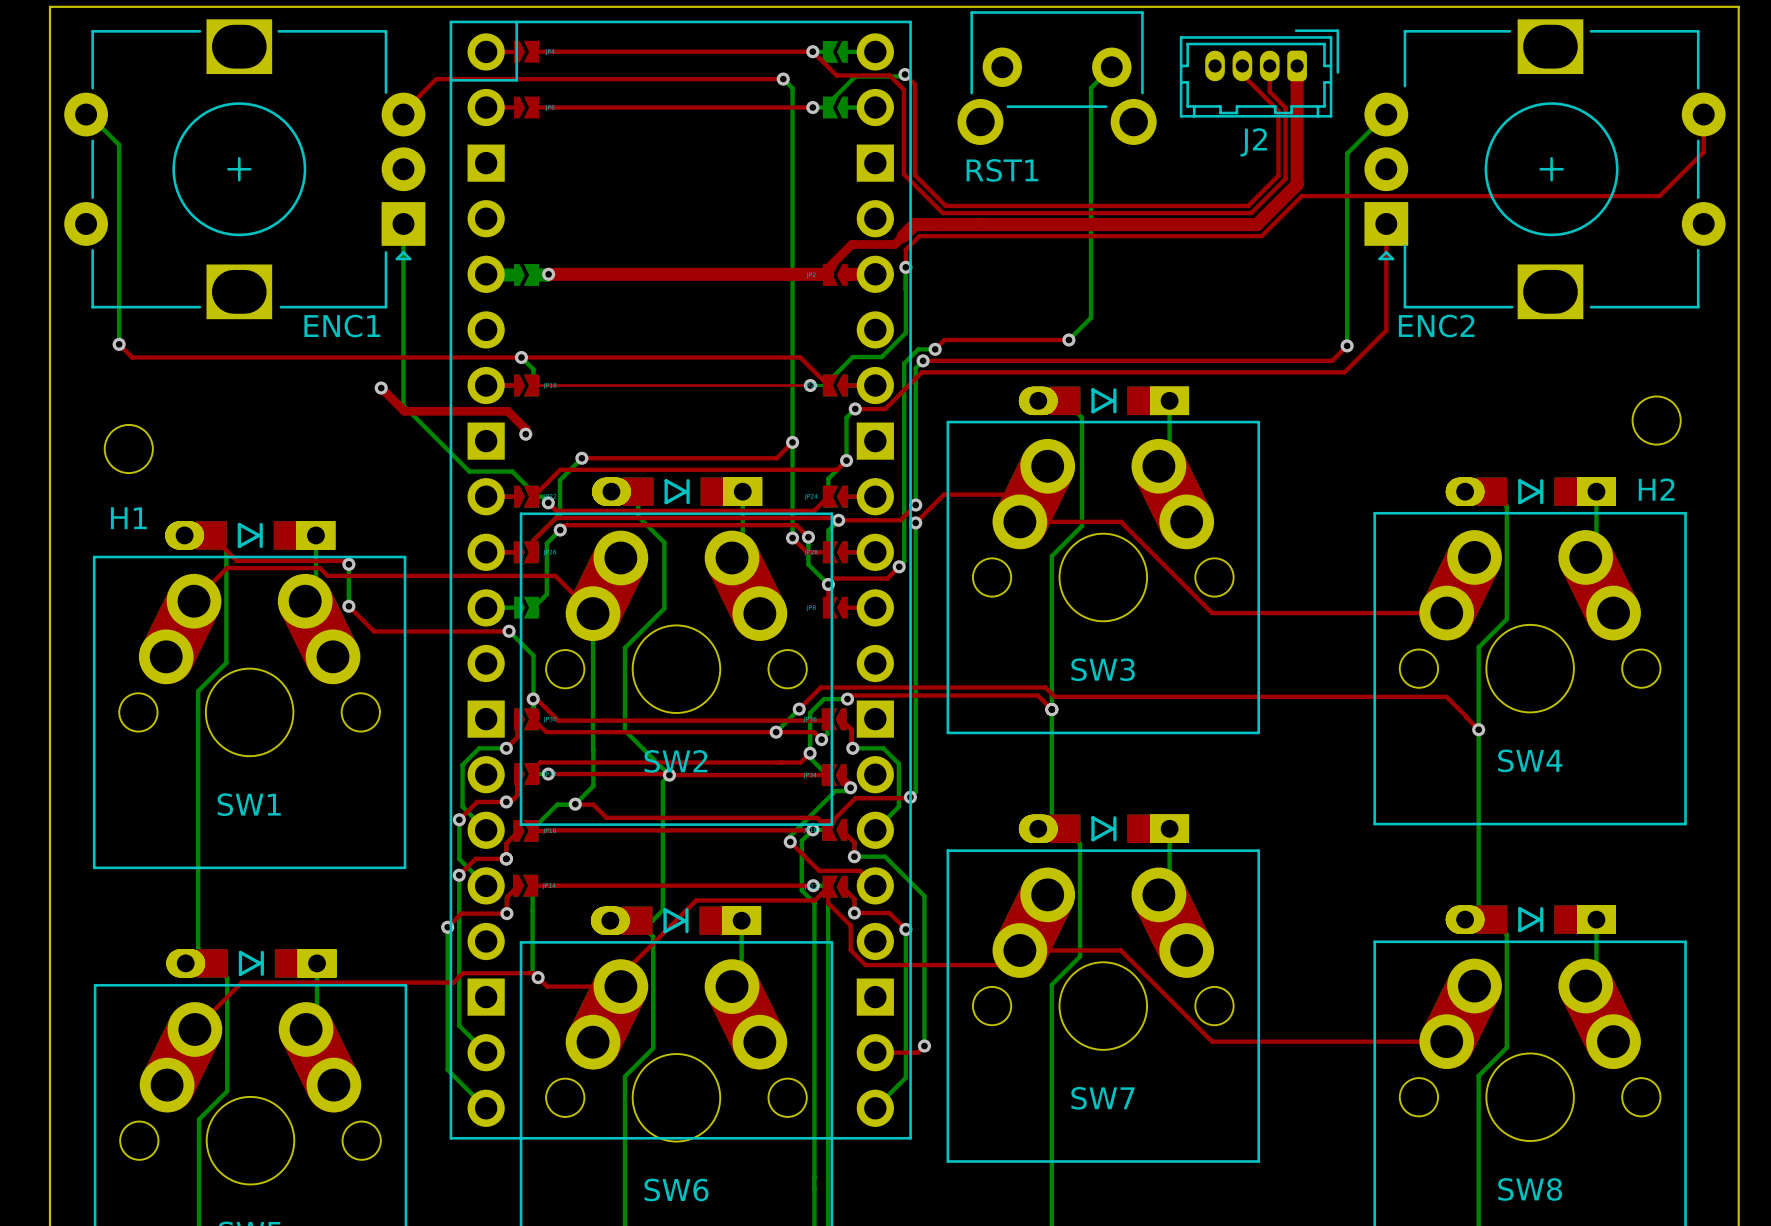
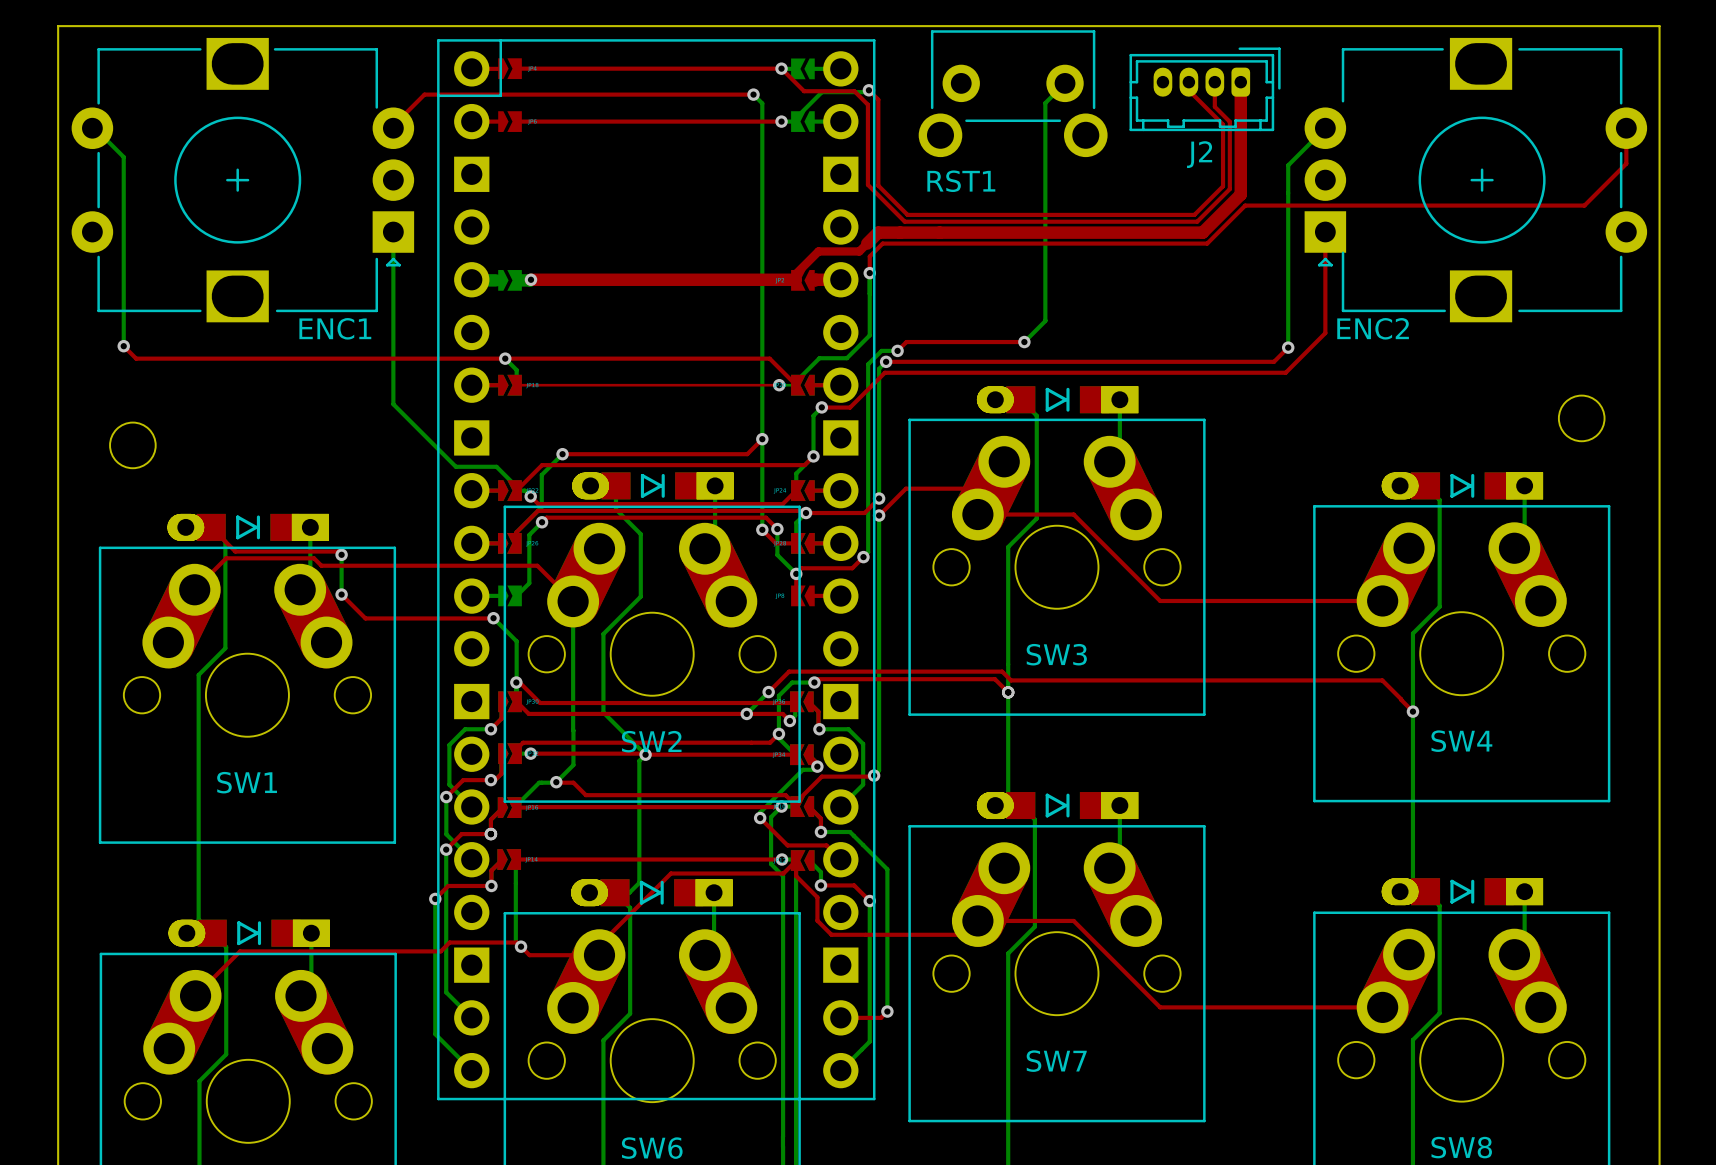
top track: (381, 388) (404, 411) (507, 411) (525, 429) (525, 434) -> none
via: (381, 388) -> none
via: (525, 434) -> none
H2 name: H2 (1656, 489) -> none
H1 name: H1 (128, 518) -> none
top track: (842, 886) (854, 899) (854, 913) -> none

